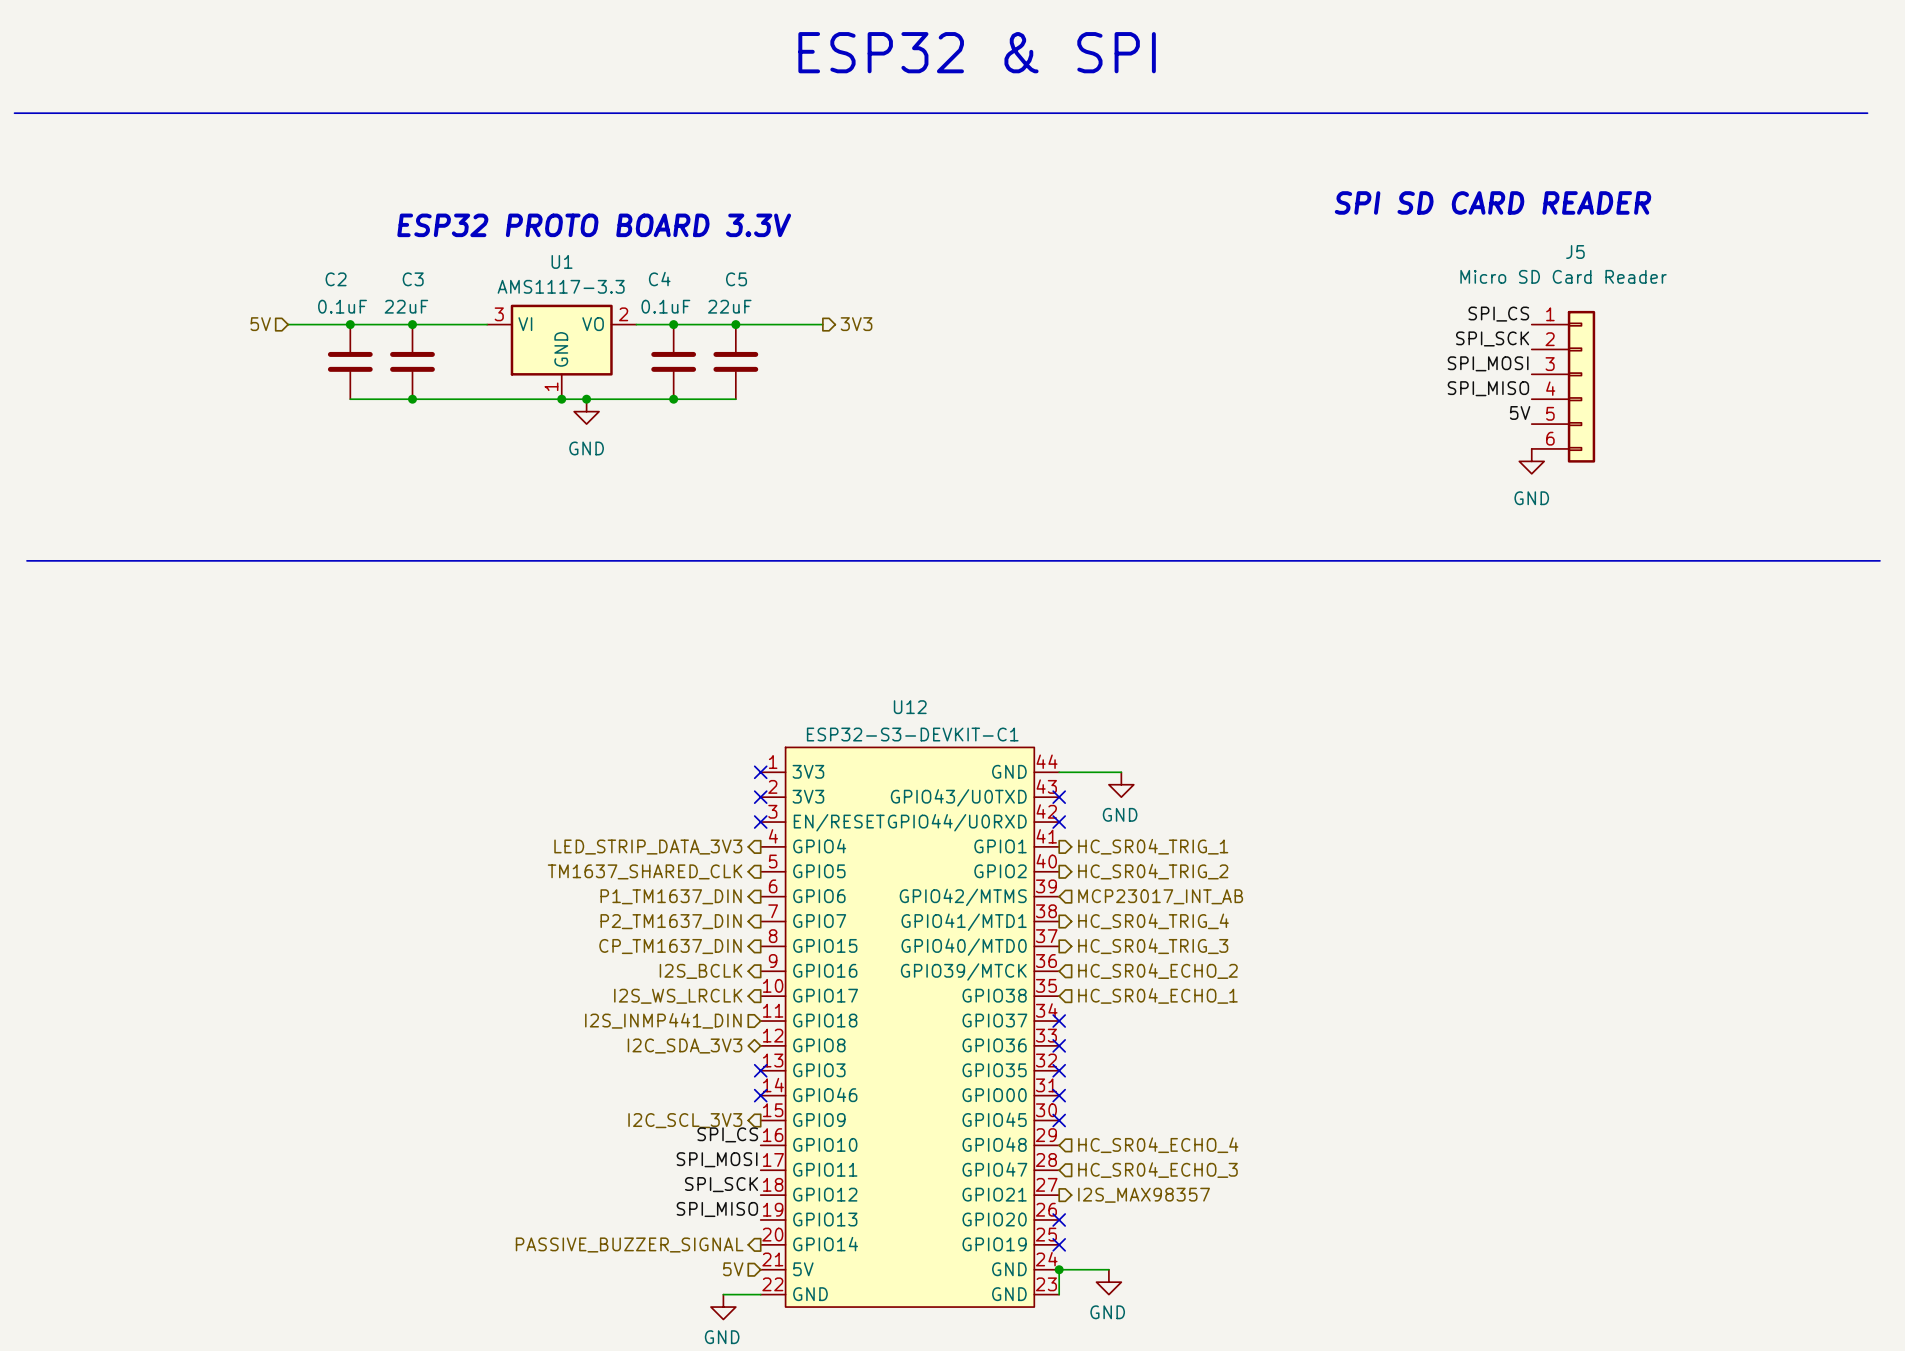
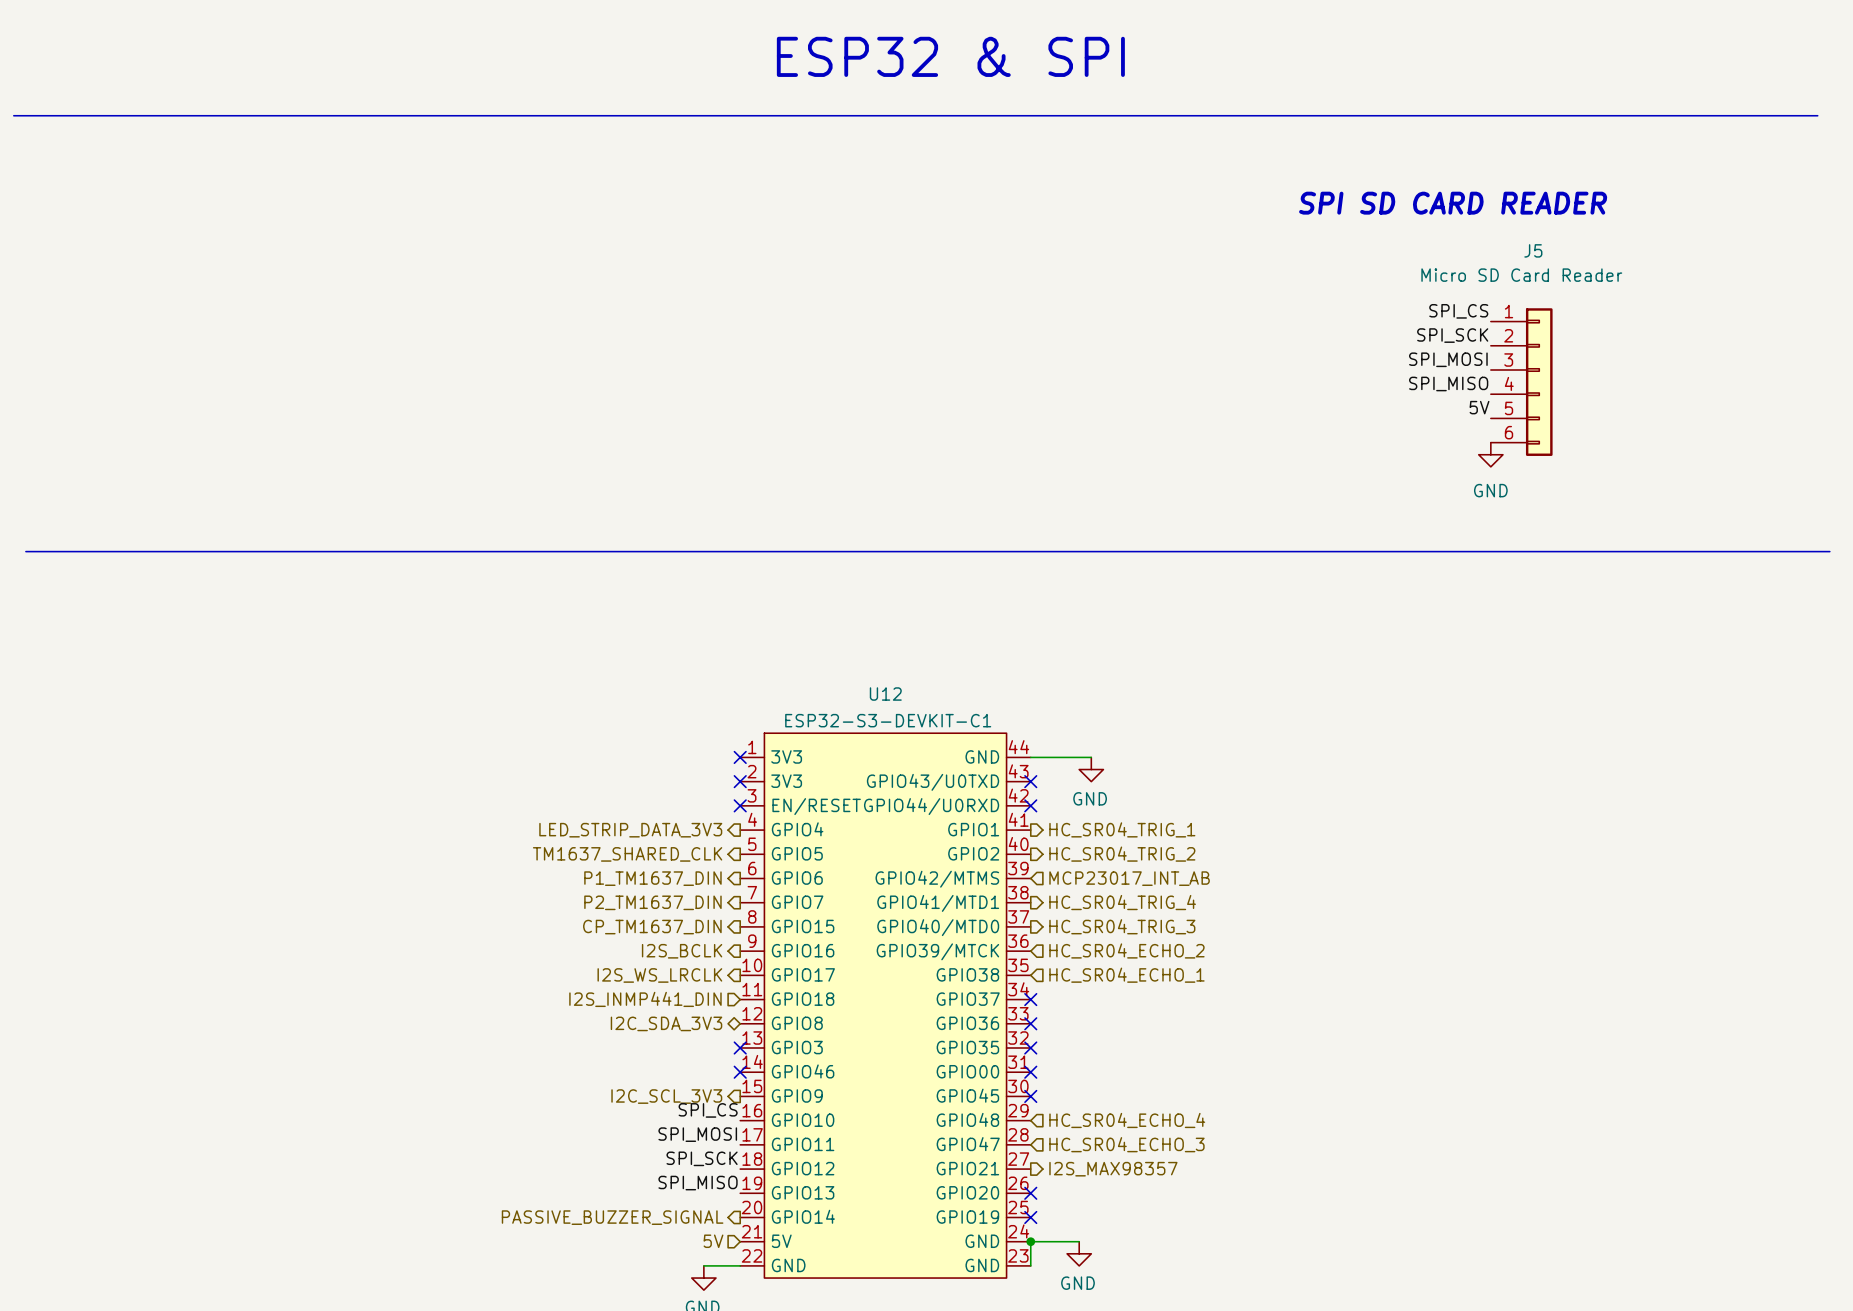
text: ESP32 PROTO BOARD 3.3V (594, 225) -> none
hierarchical label: 5V (260, 324) -> none
wire: (288, 324) (487, 324) -> none
junction: (350, 324) -> none
junction: (412, 324) -> none
wire: (636, 324) (822, 324) -> none
junction: (673, 324) -> none
junction: (735, 324) -> none
hierarchical label: 3V3 (856, 324) -> none
U1: AMS1117-3.3 (561, 351) -> none
C2: 0.1uF (350, 361) -> none
C3: 22uF (412, 361) -> none
C4: 0.1uF (673, 361) -> none
C5: 22uF (735, 361) -> none
wire: (350, 399) (735, 399) -> none
junction: (412, 399) -> none
junction: (561, 399) -> none
junction: (586, 399) -> none
junction: (673, 399) -> none
power symbol: GND (586, 411) -> none

